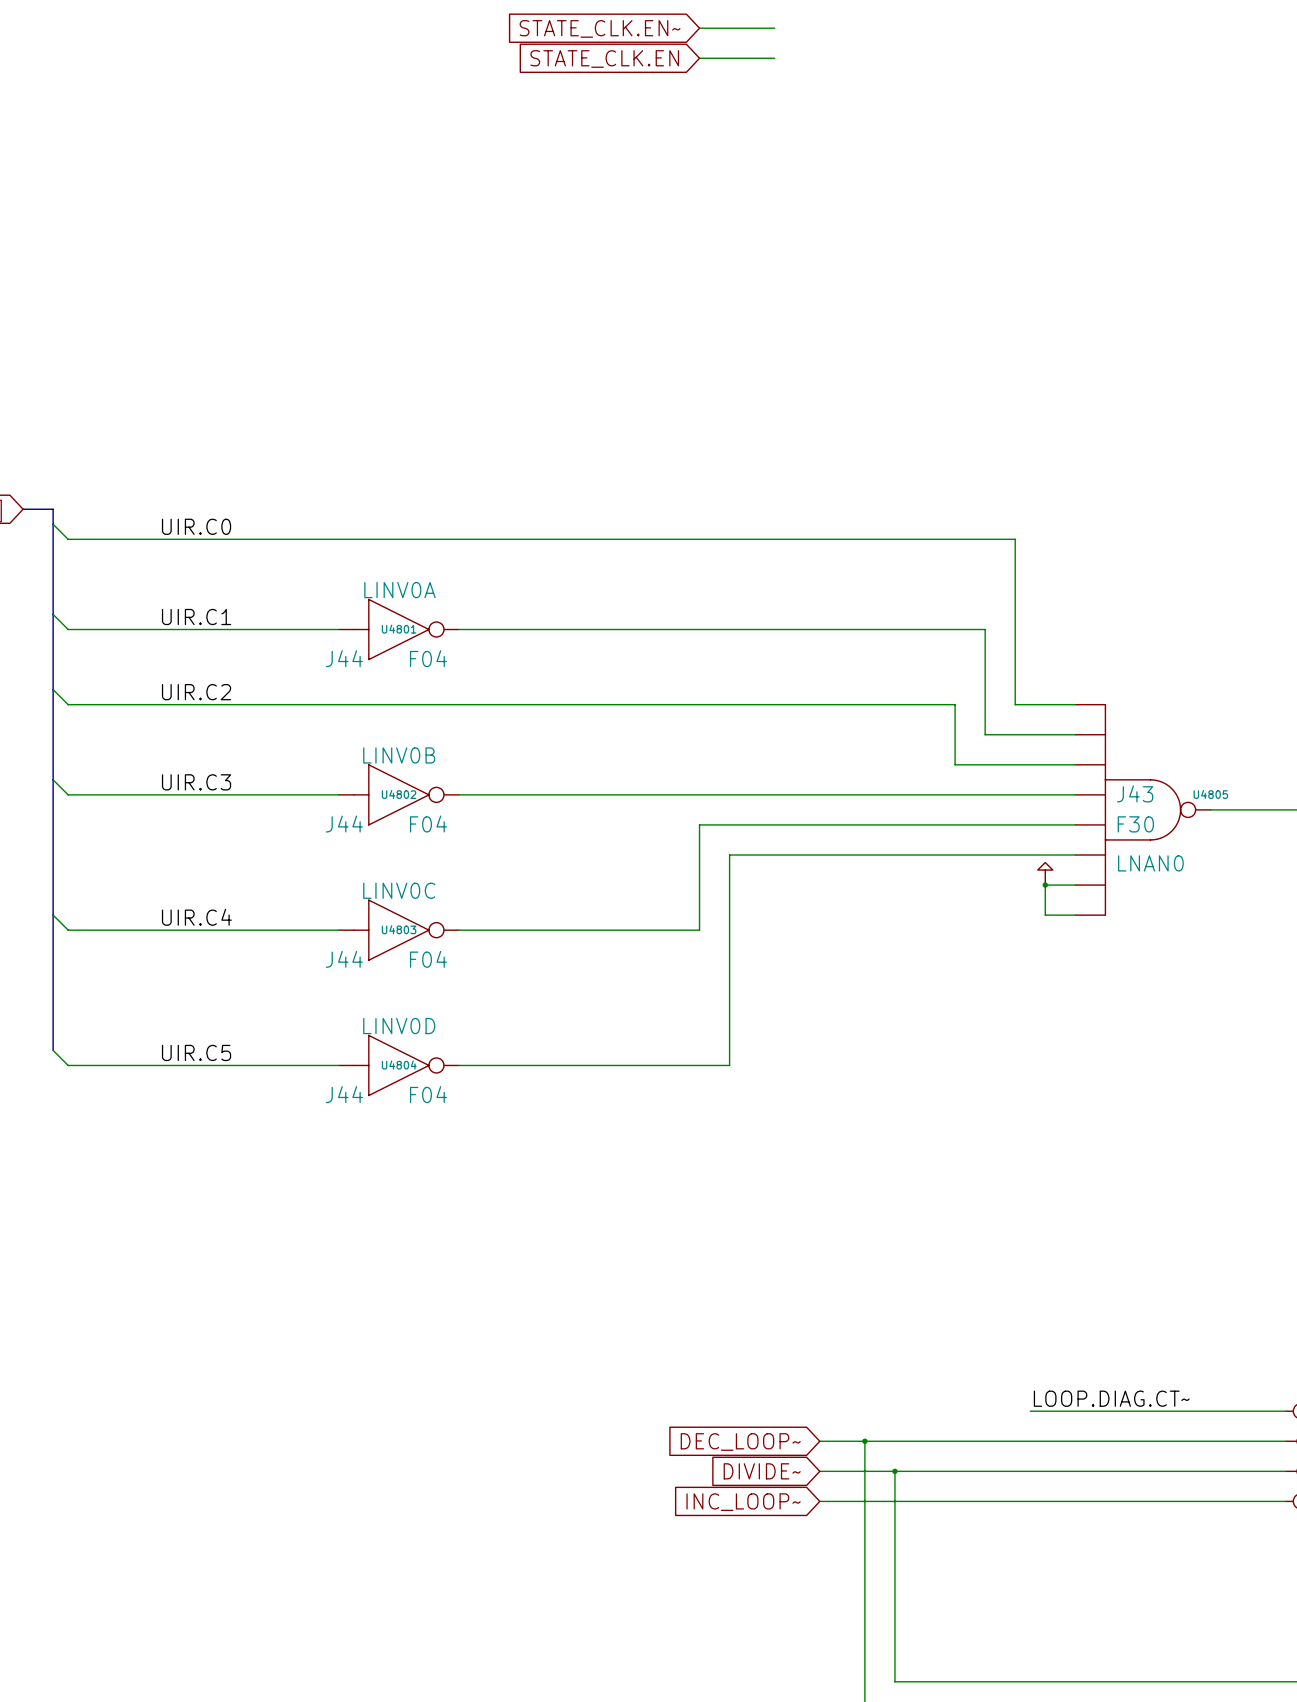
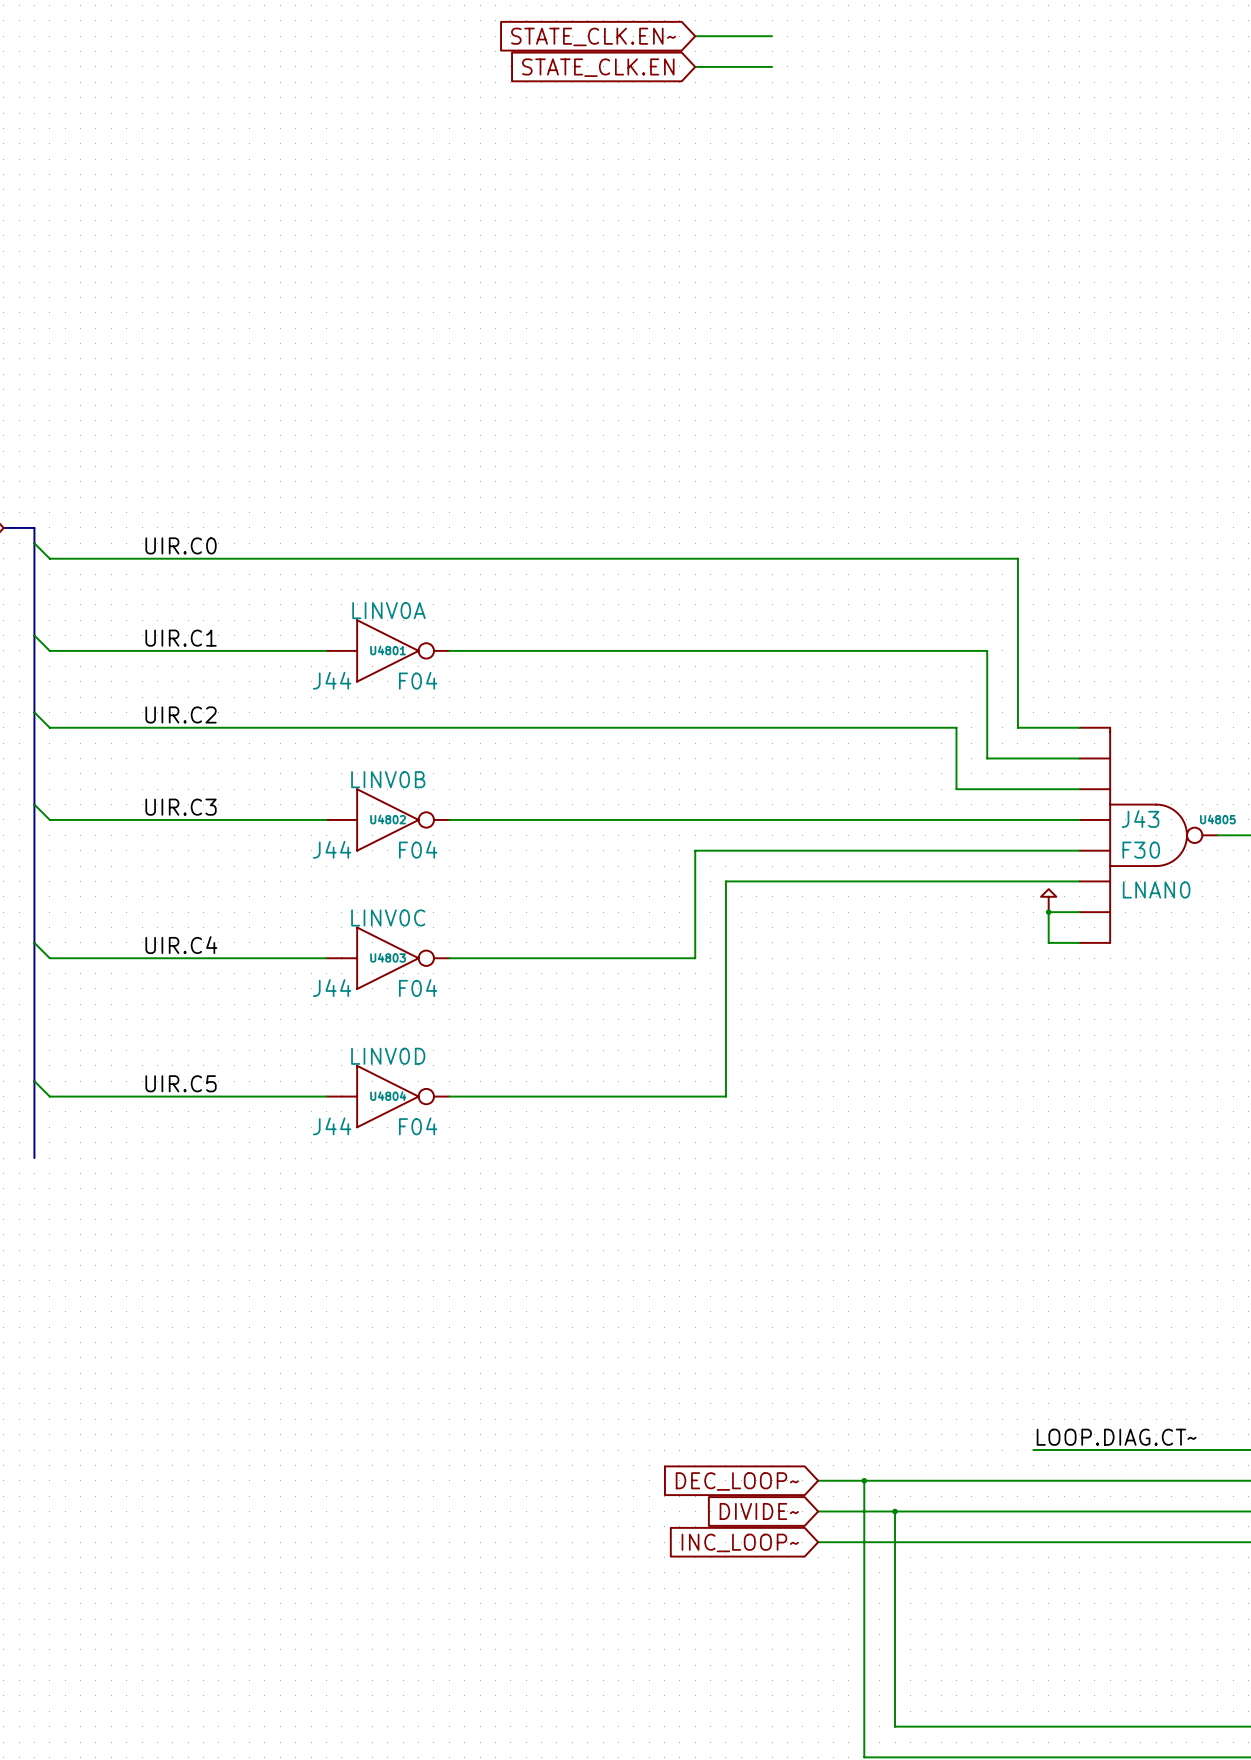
bus: none -> (34, 1081) (34, 1158)

